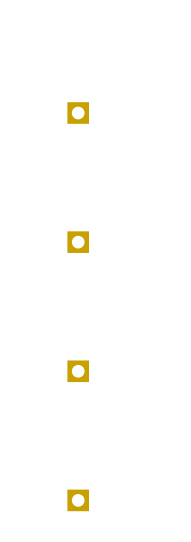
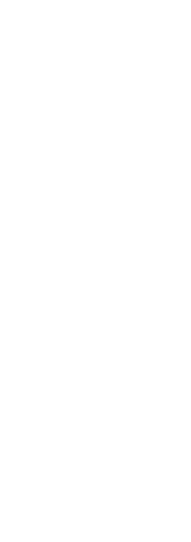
part: (78, 113) -> none
part: (78, 242) -> none
part: (78, 371) -> none
part: (78, 500) -> none

